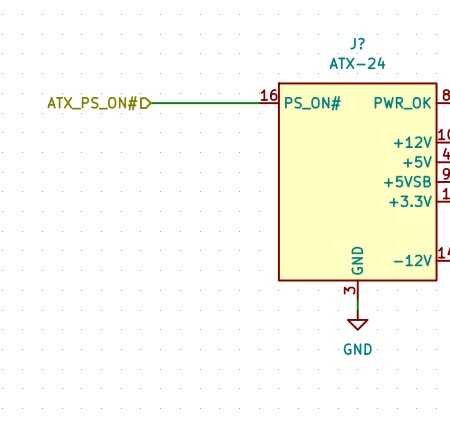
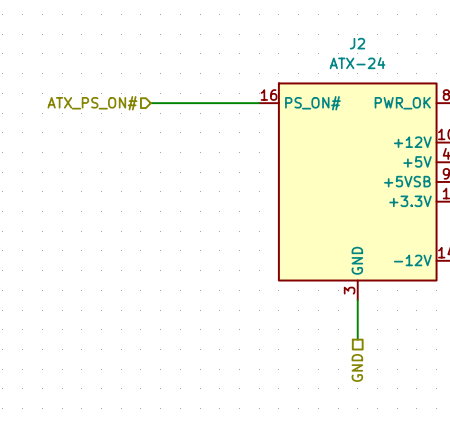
J? name: J? (357, 43) -> J2 (357, 43)
wire: none -> (357, 310) (357, 339)
power symbol: GND (357, 319) -> none
hierarchical label: none -> GND (357, 367)

